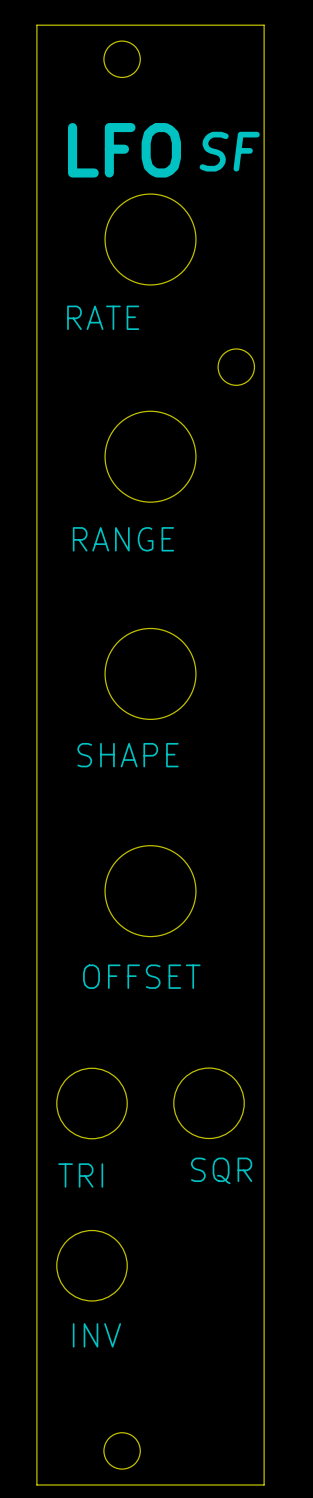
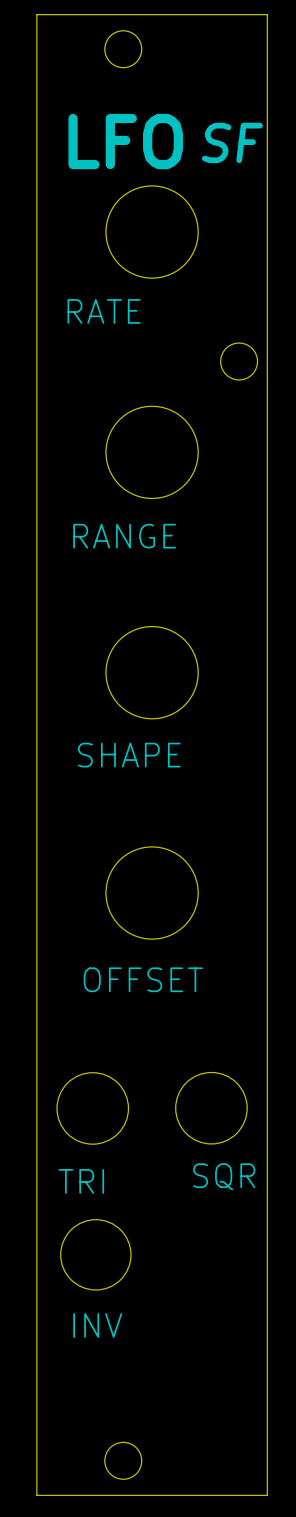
round board edge: none -> [60, 1219, 132, 1291]
round board edge: [56, 1229, 128, 1302] -> none
text position: INV (96, 1335) -> INV (97, 1325)

